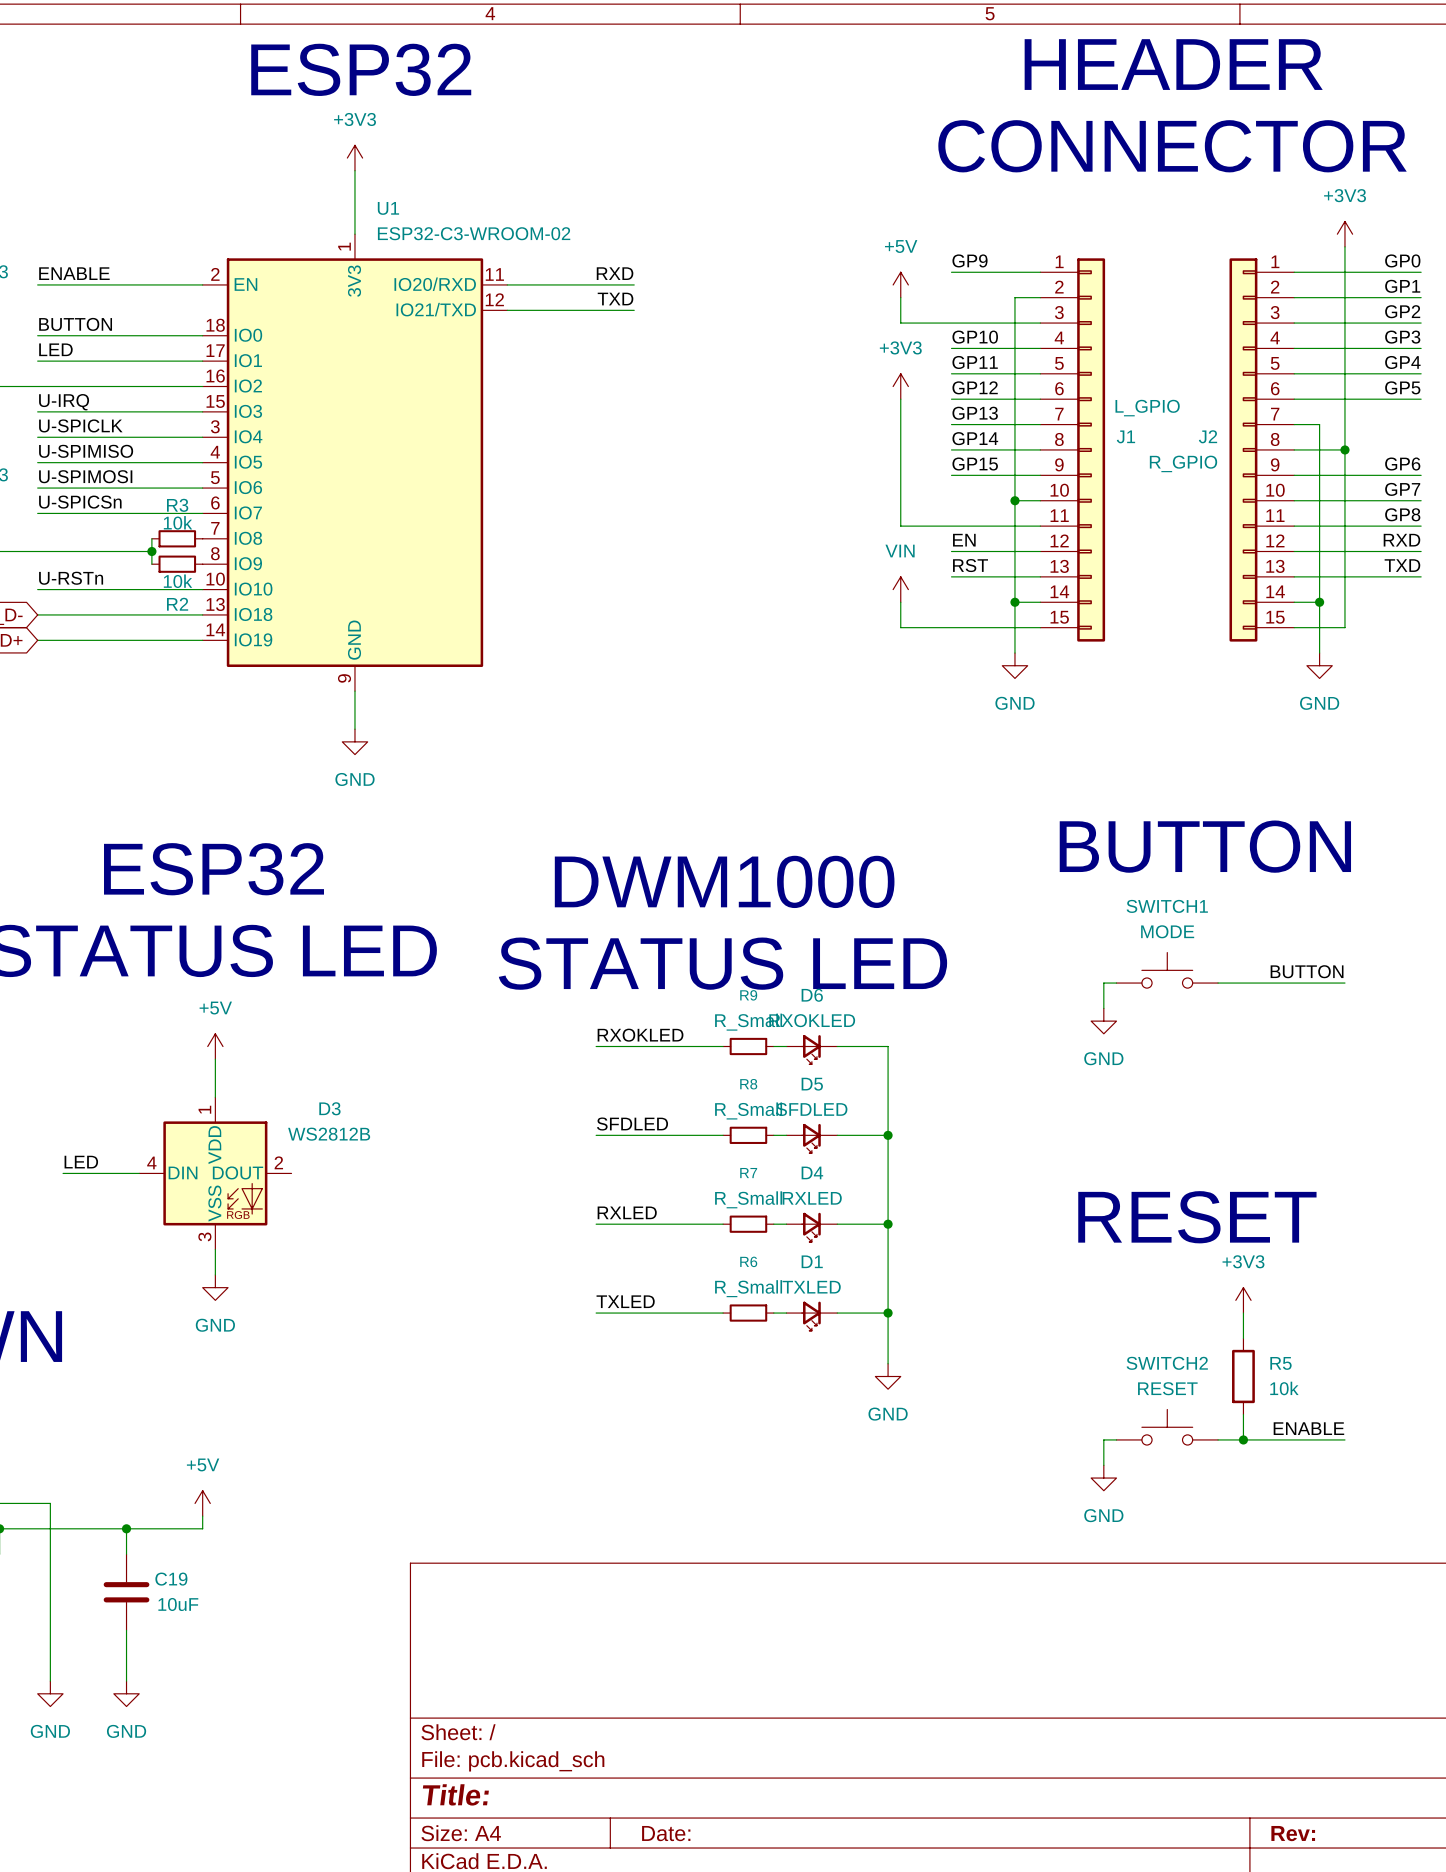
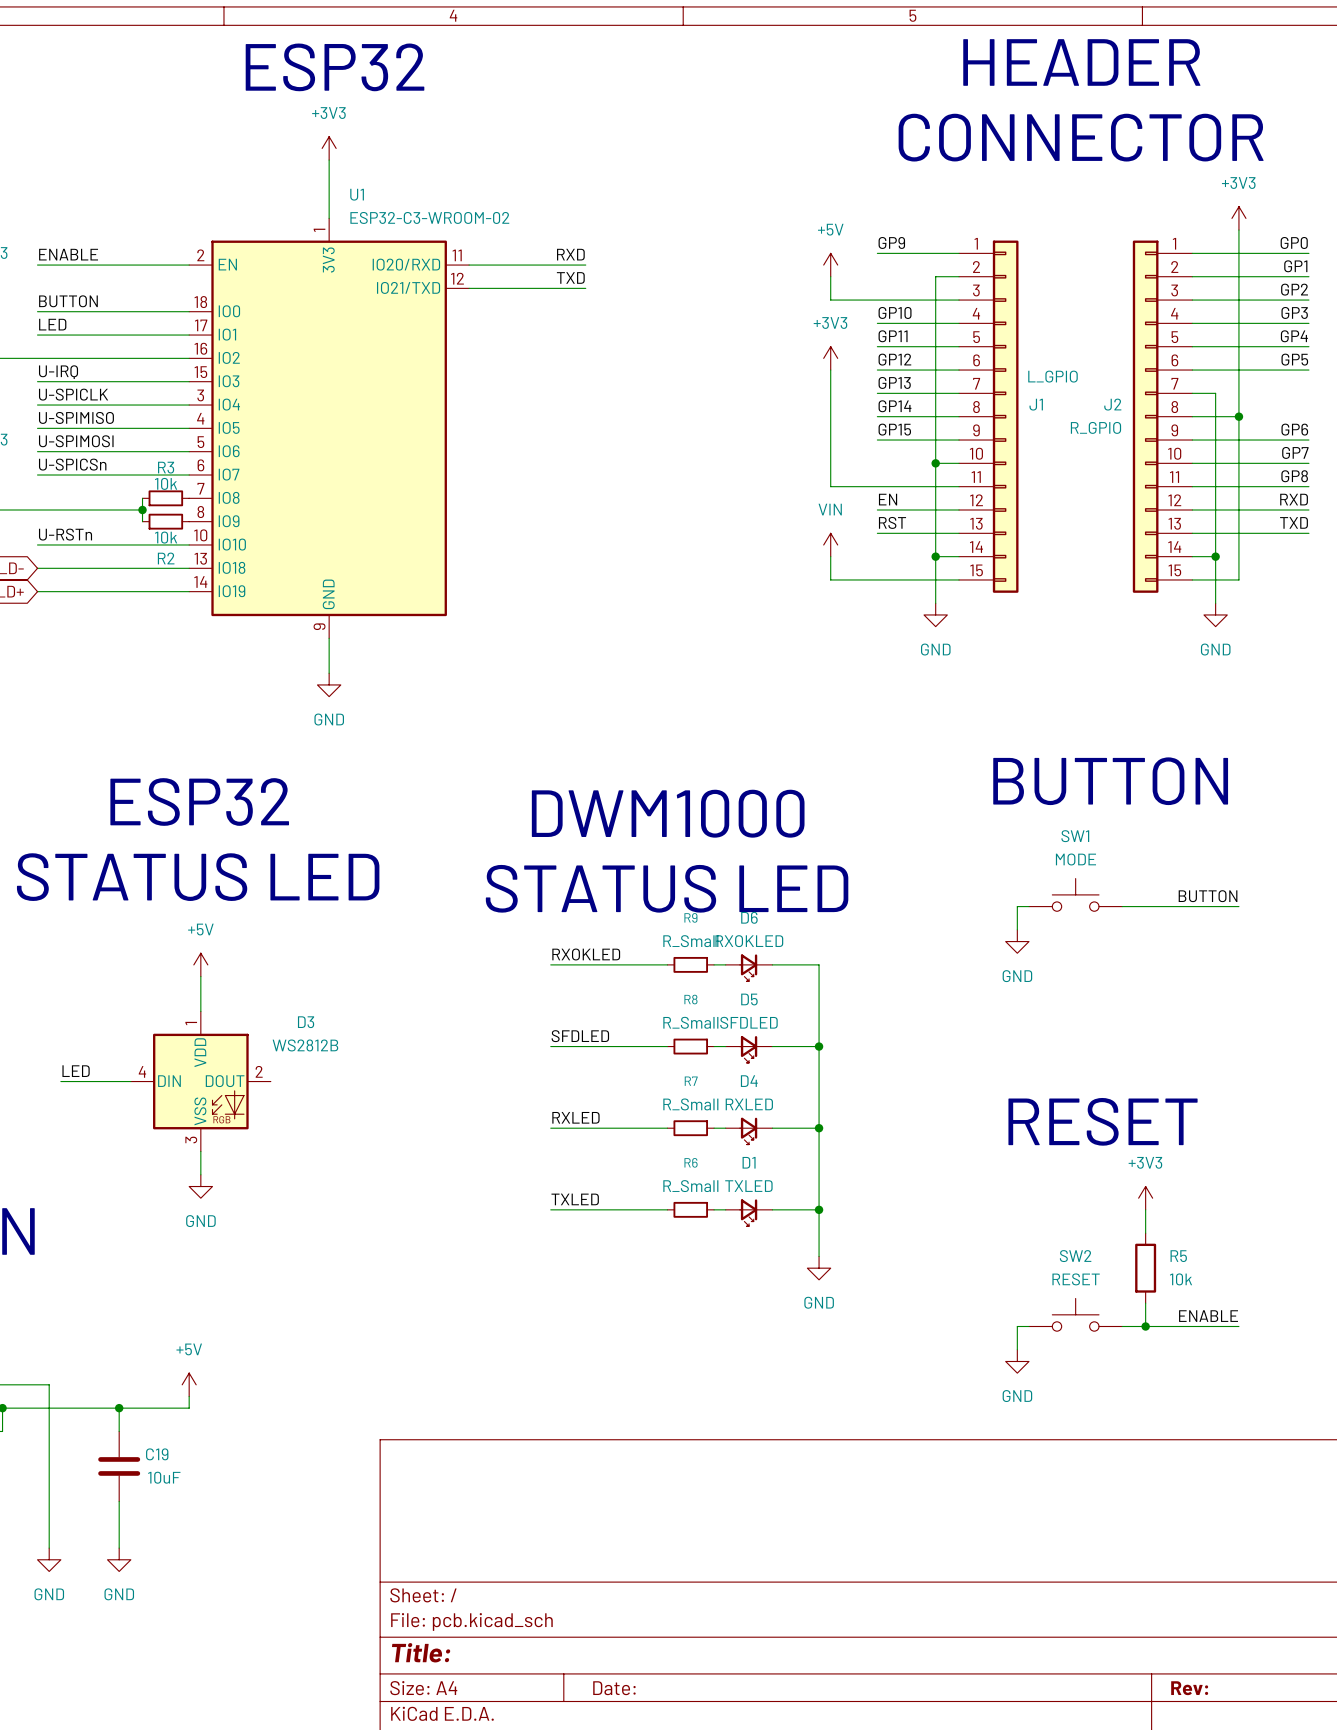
SWITCH1 name: SWITCH1 (1167, 906) -> SW1 (1075, 836)
SWITCH2 name: SWITCH2 (1167, 1363) -> SW2 (1075, 1256)

